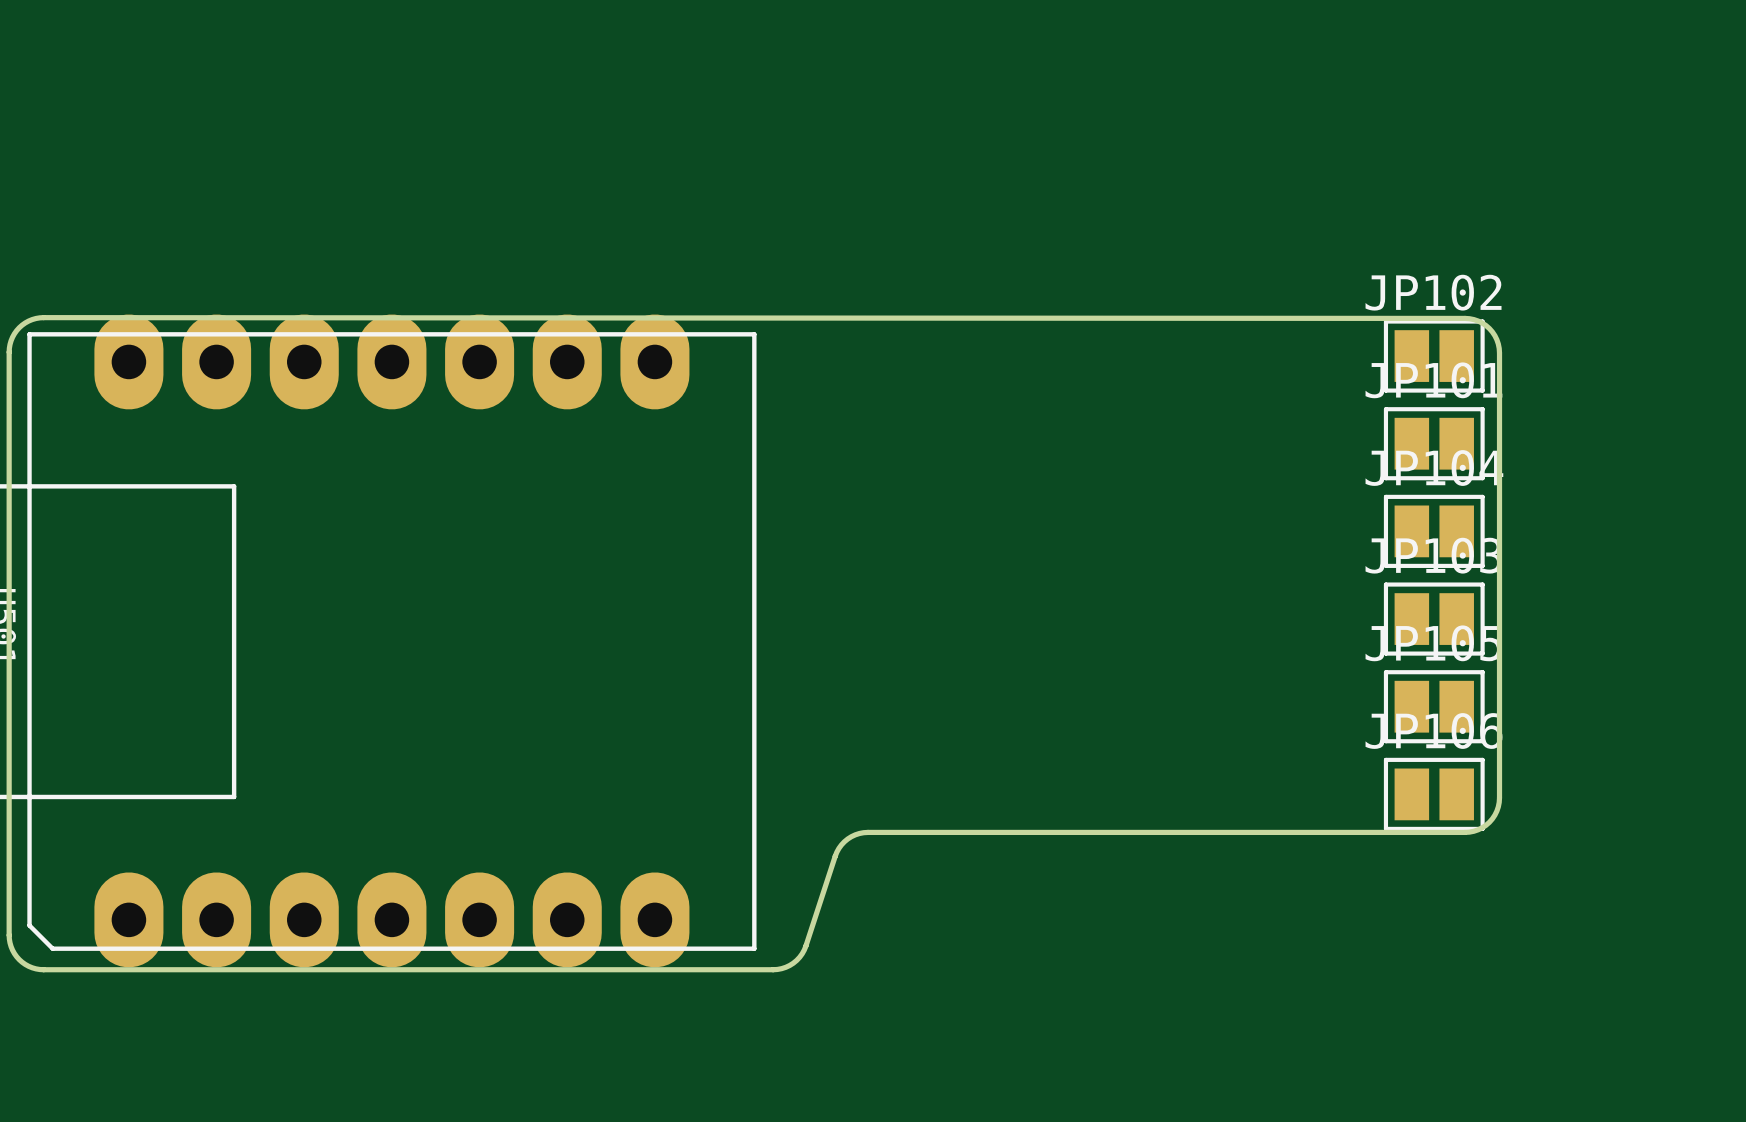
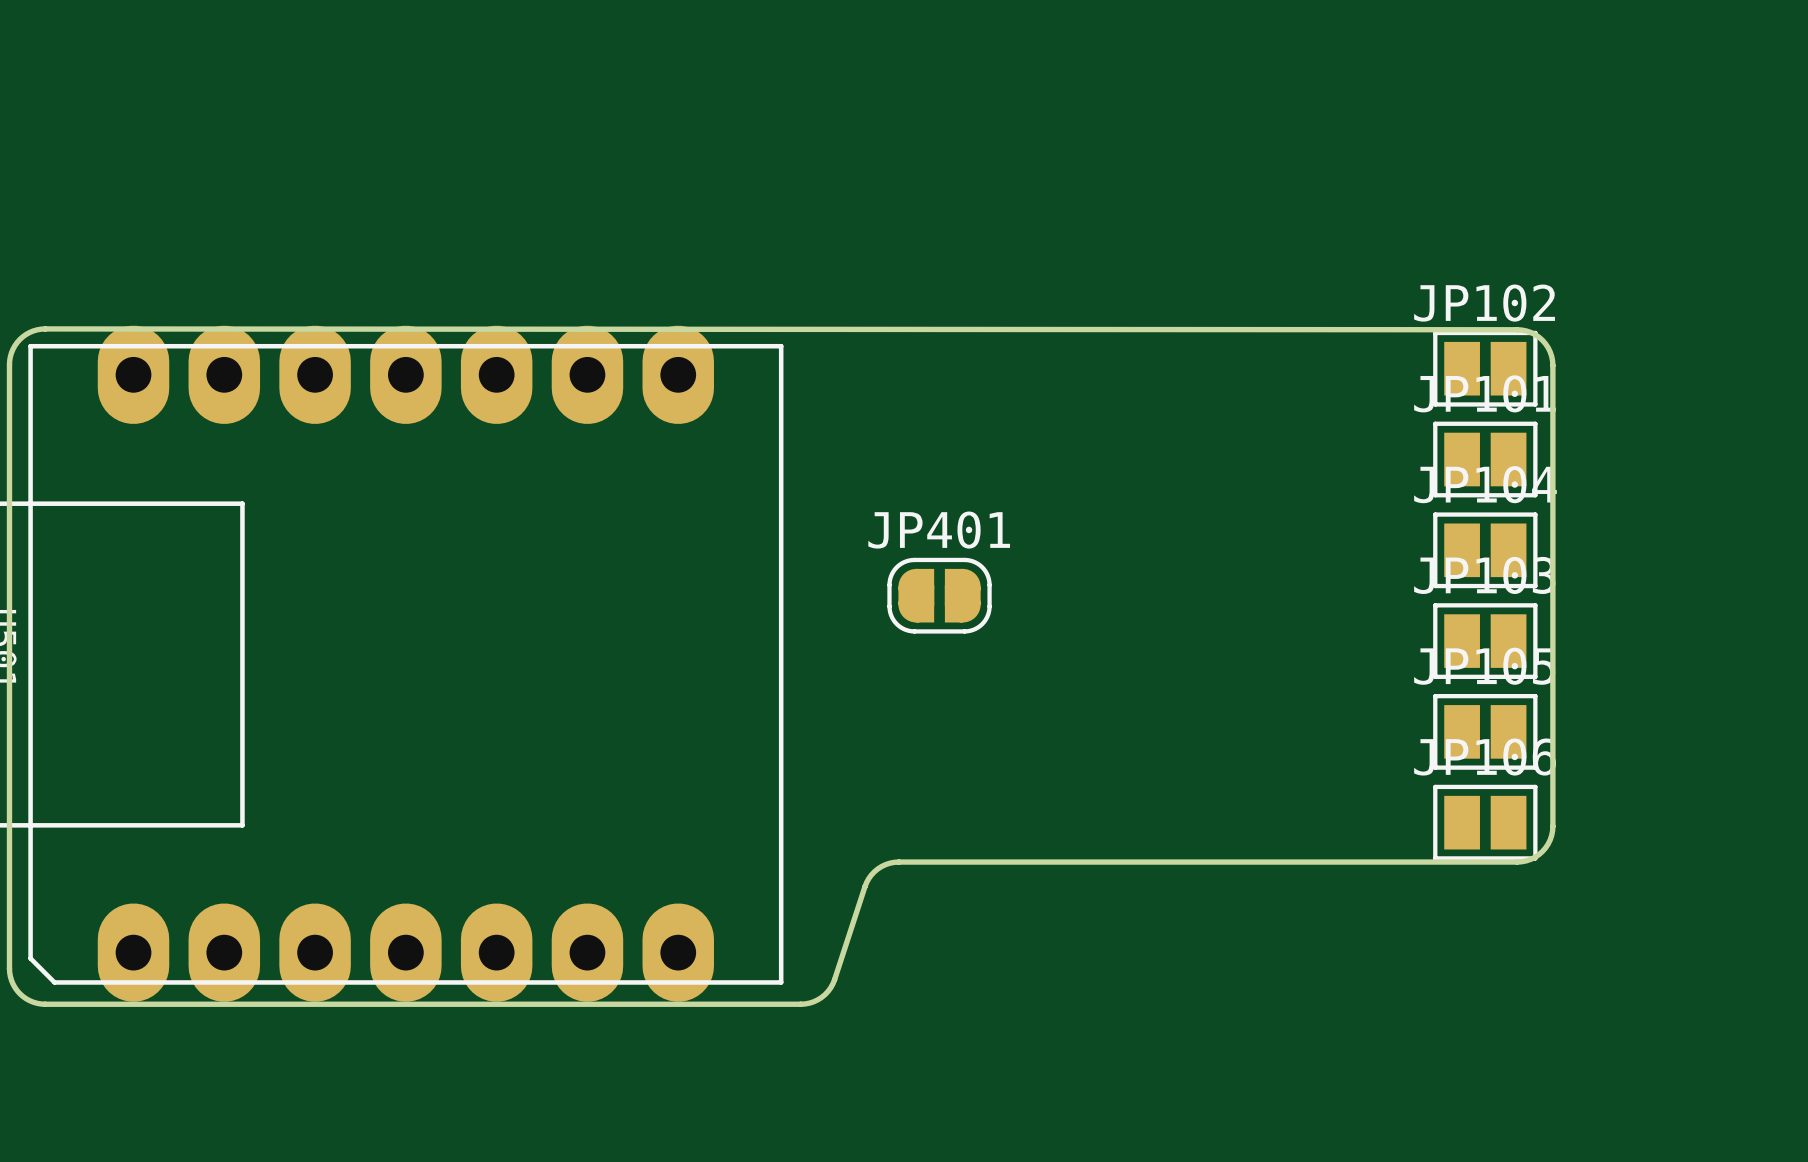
JP401: none -> (939, 595)

